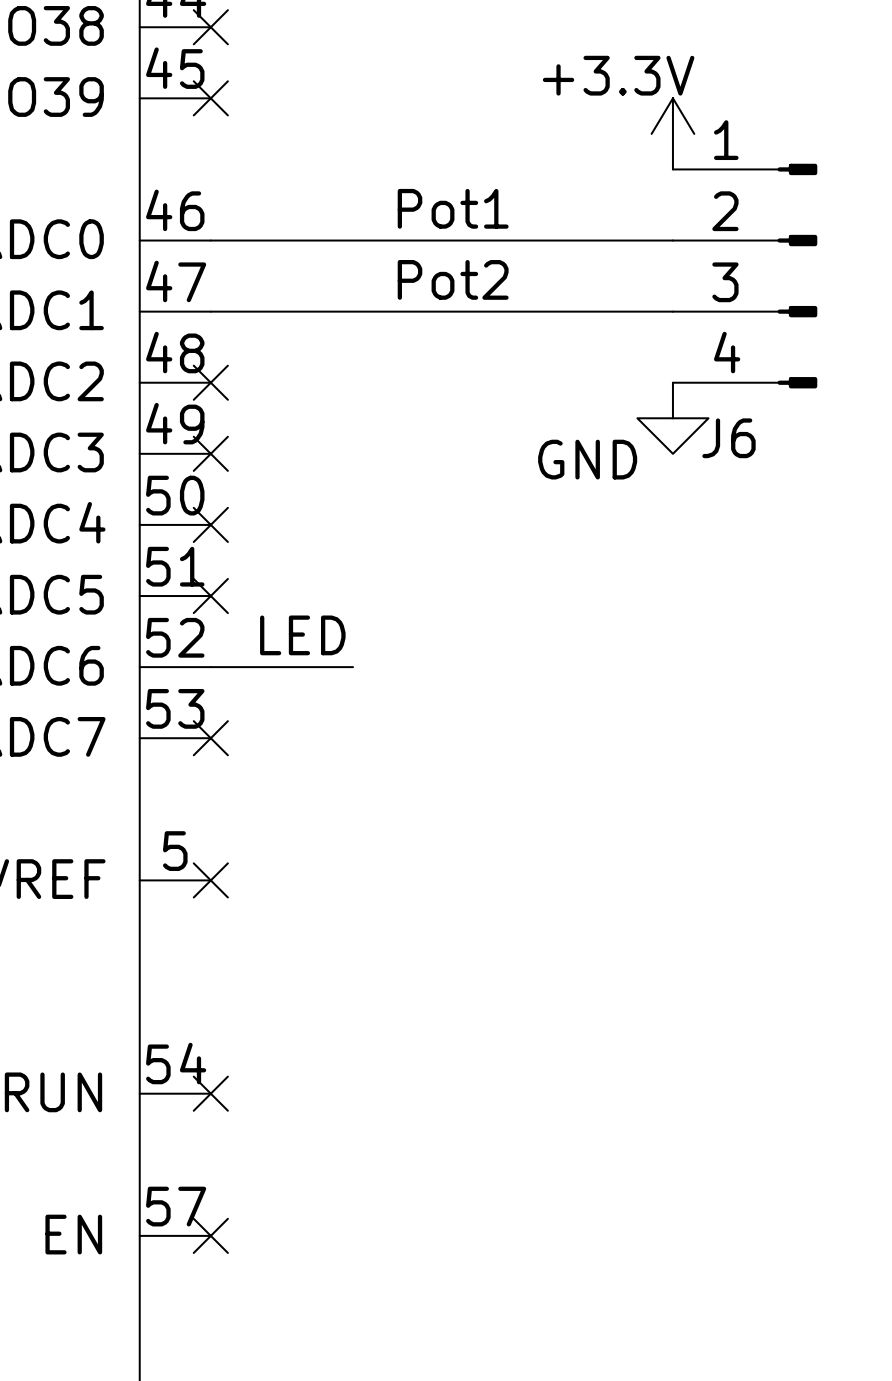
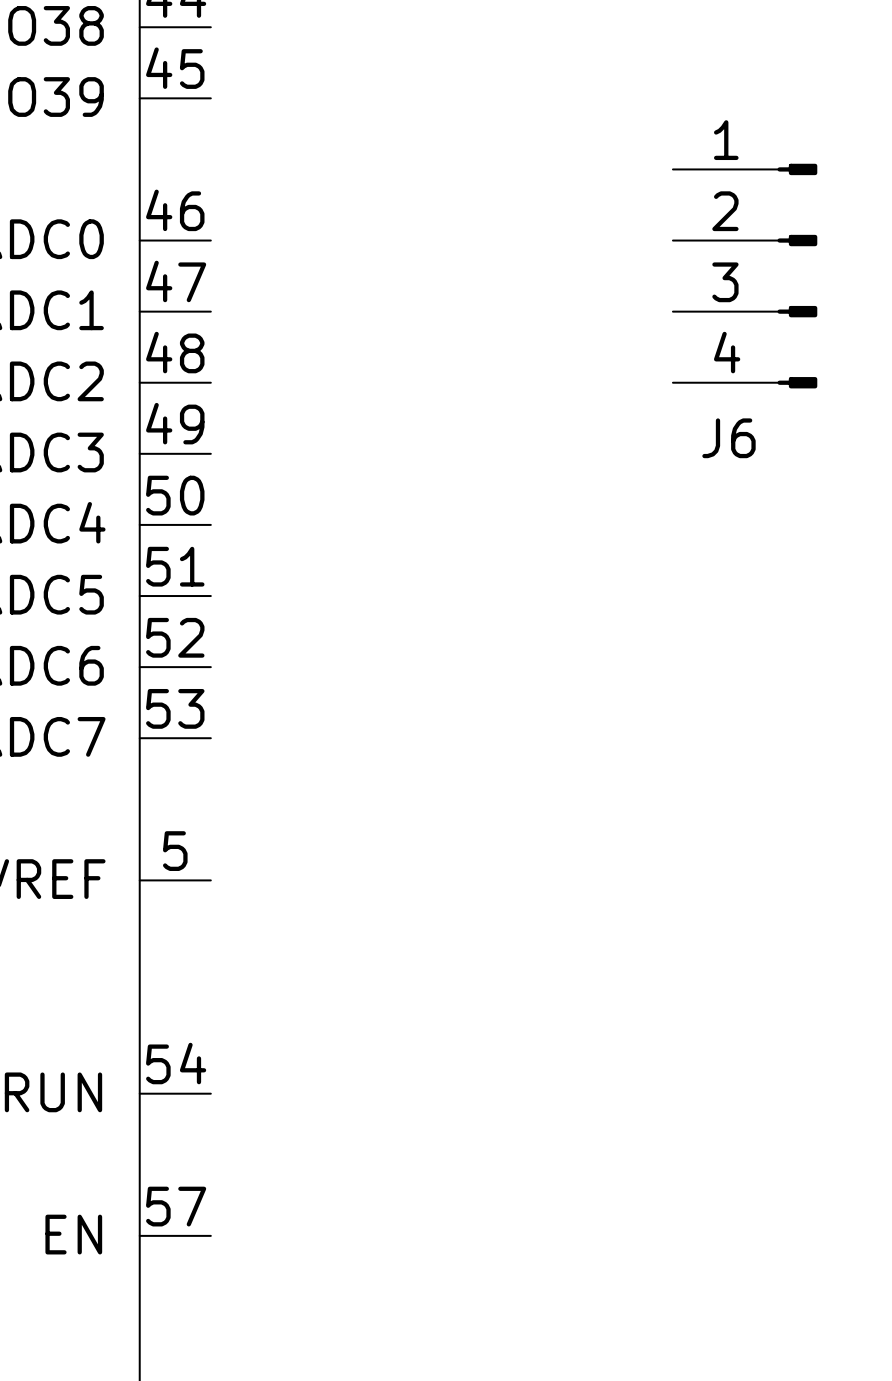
no-connect mark: (210, 27) -> none
no-connect mark: (210, 98) -> none
power symbol: +3.3V (672, 133) -> none
label: Pot1 (453, 208) -> none
wire: (210, 240) (672, 240) -> none
label: Pot2 (453, 279) -> none
wire: (210, 311) (672, 311) -> none
no-connect mark: (210, 382) -> none
power symbol: GND (672, 418) -> none
no-connect mark: (210, 453) -> none
no-connect mark: (210, 524) -> none
no-connect mark: (210, 596) -> none
label: LED (302, 635) -> none
wire: (210, 667) (353, 667) -> none
no-connect mark: (210, 738) -> none
no-connect mark: (210, 880) -> none
no-connect mark: (210, 1093) -> none
no-connect mark: (210, 1235) -> none

